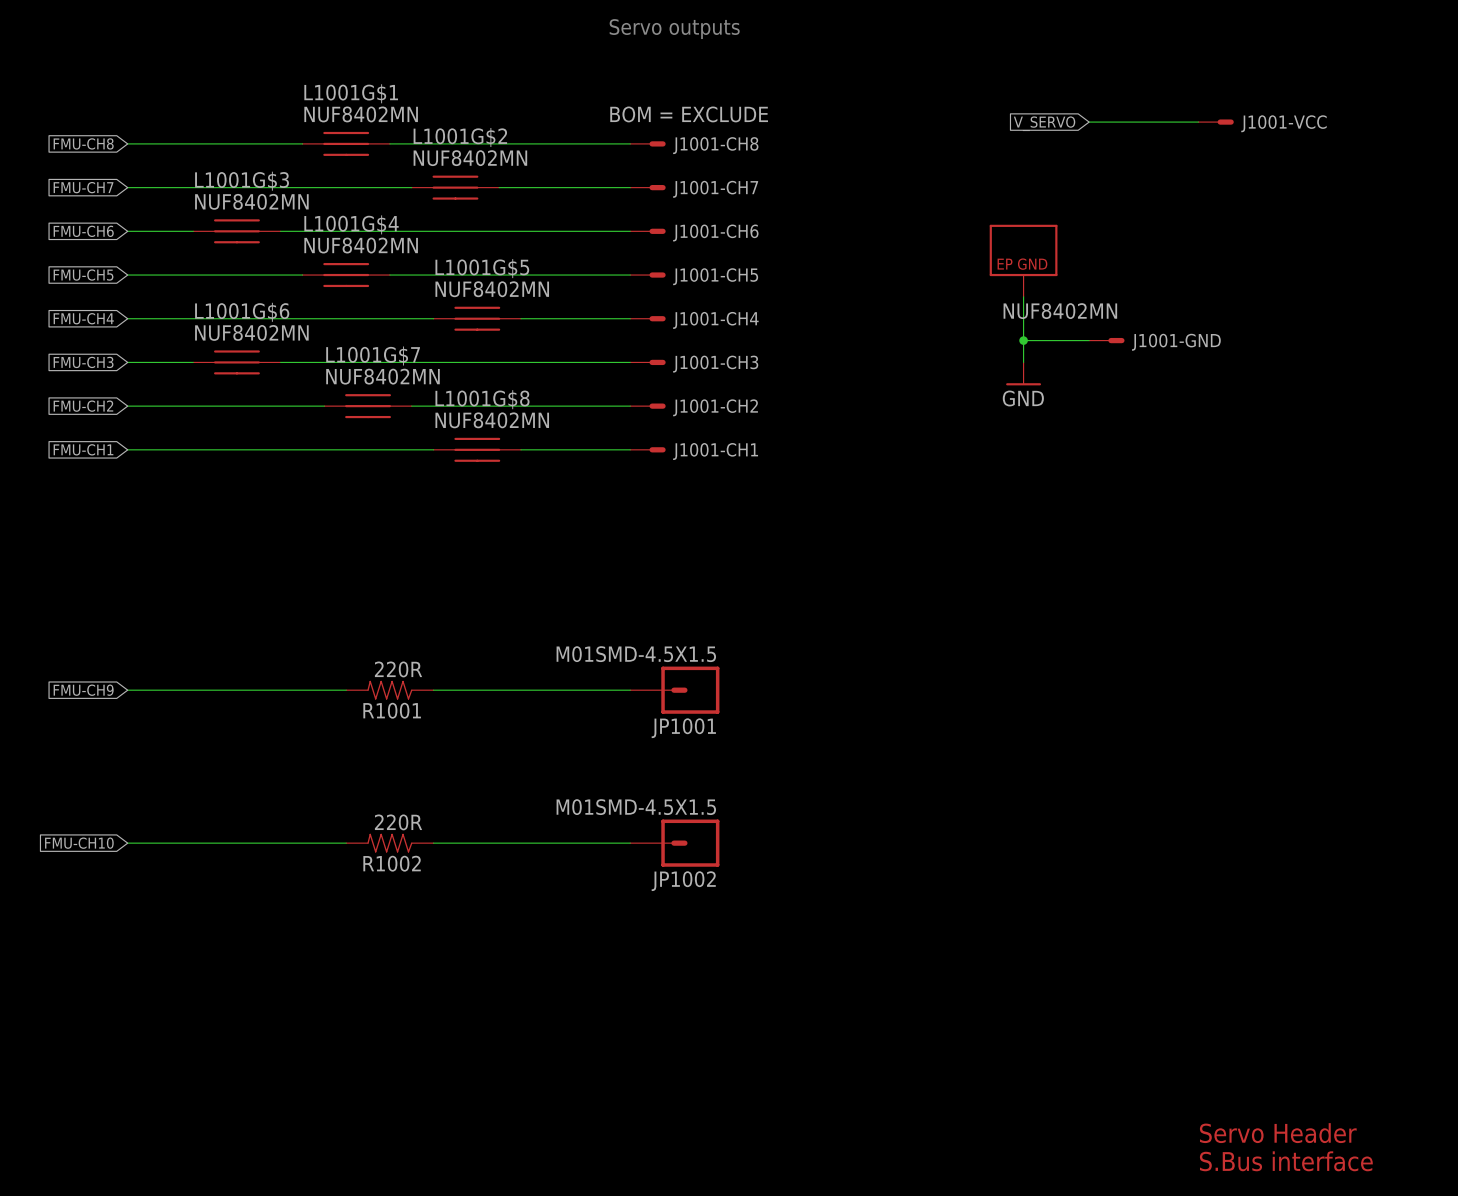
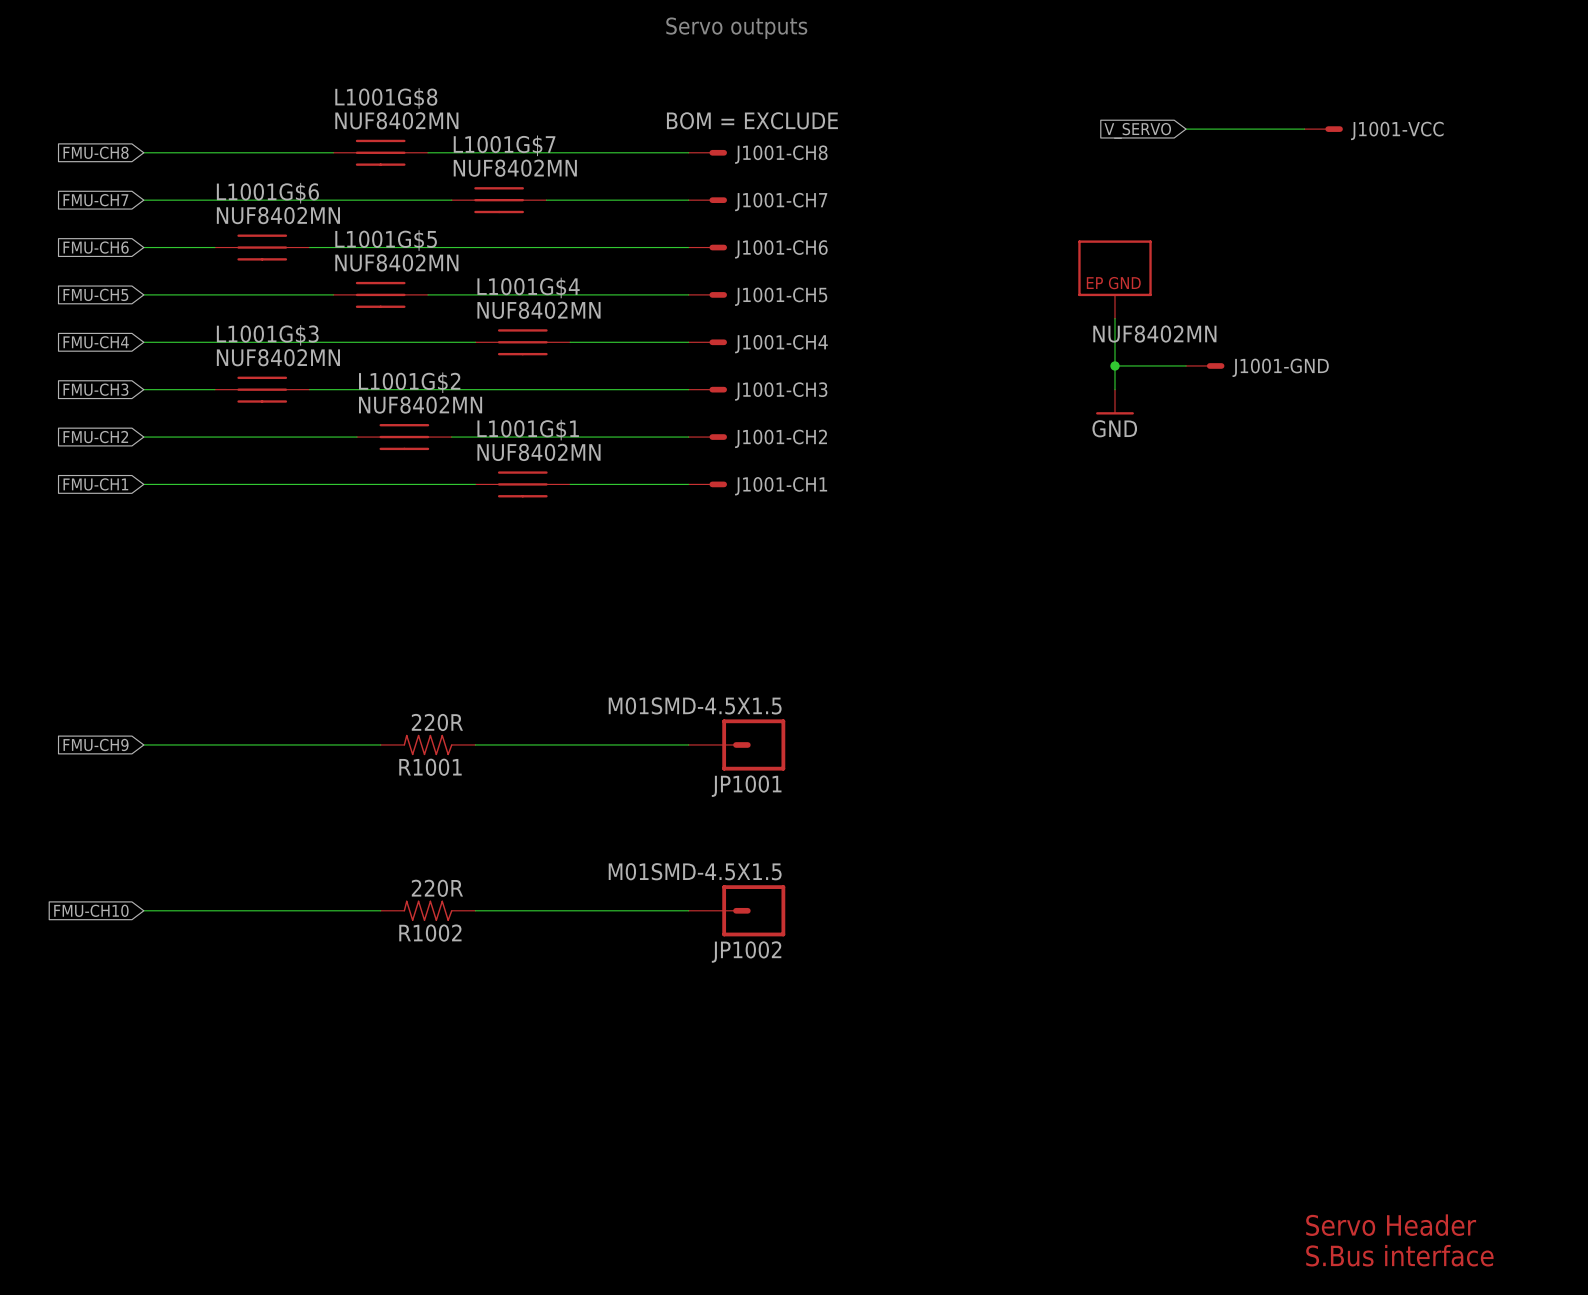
L1001G$1 name: L1001G$1 (351, 93) -> L1001G$8 (386, 98)
L1001G$2 name: L1001G$2 (460, 137) -> L1001G$7 (504, 145)
L1001G$3 name: L1001G$3 (242, 181) -> L1001G$6 (267, 193)
L1001G$4 name: L1001G$4 (351, 224) -> L1001G$5 (386, 240)
L1001G$5 name: L1001G$5 (482, 268) -> L1001G$4 (528, 287)
L1001G$6 name: L1001G$6 (242, 312) -> L1001G$3 (267, 335)
L1001G$7 name: L1001G$7 (373, 356) -> L1001G$2 (409, 382)
L1001G$8 name: L1001G$8 (482, 399) -> L1001G$1 (528, 430)

